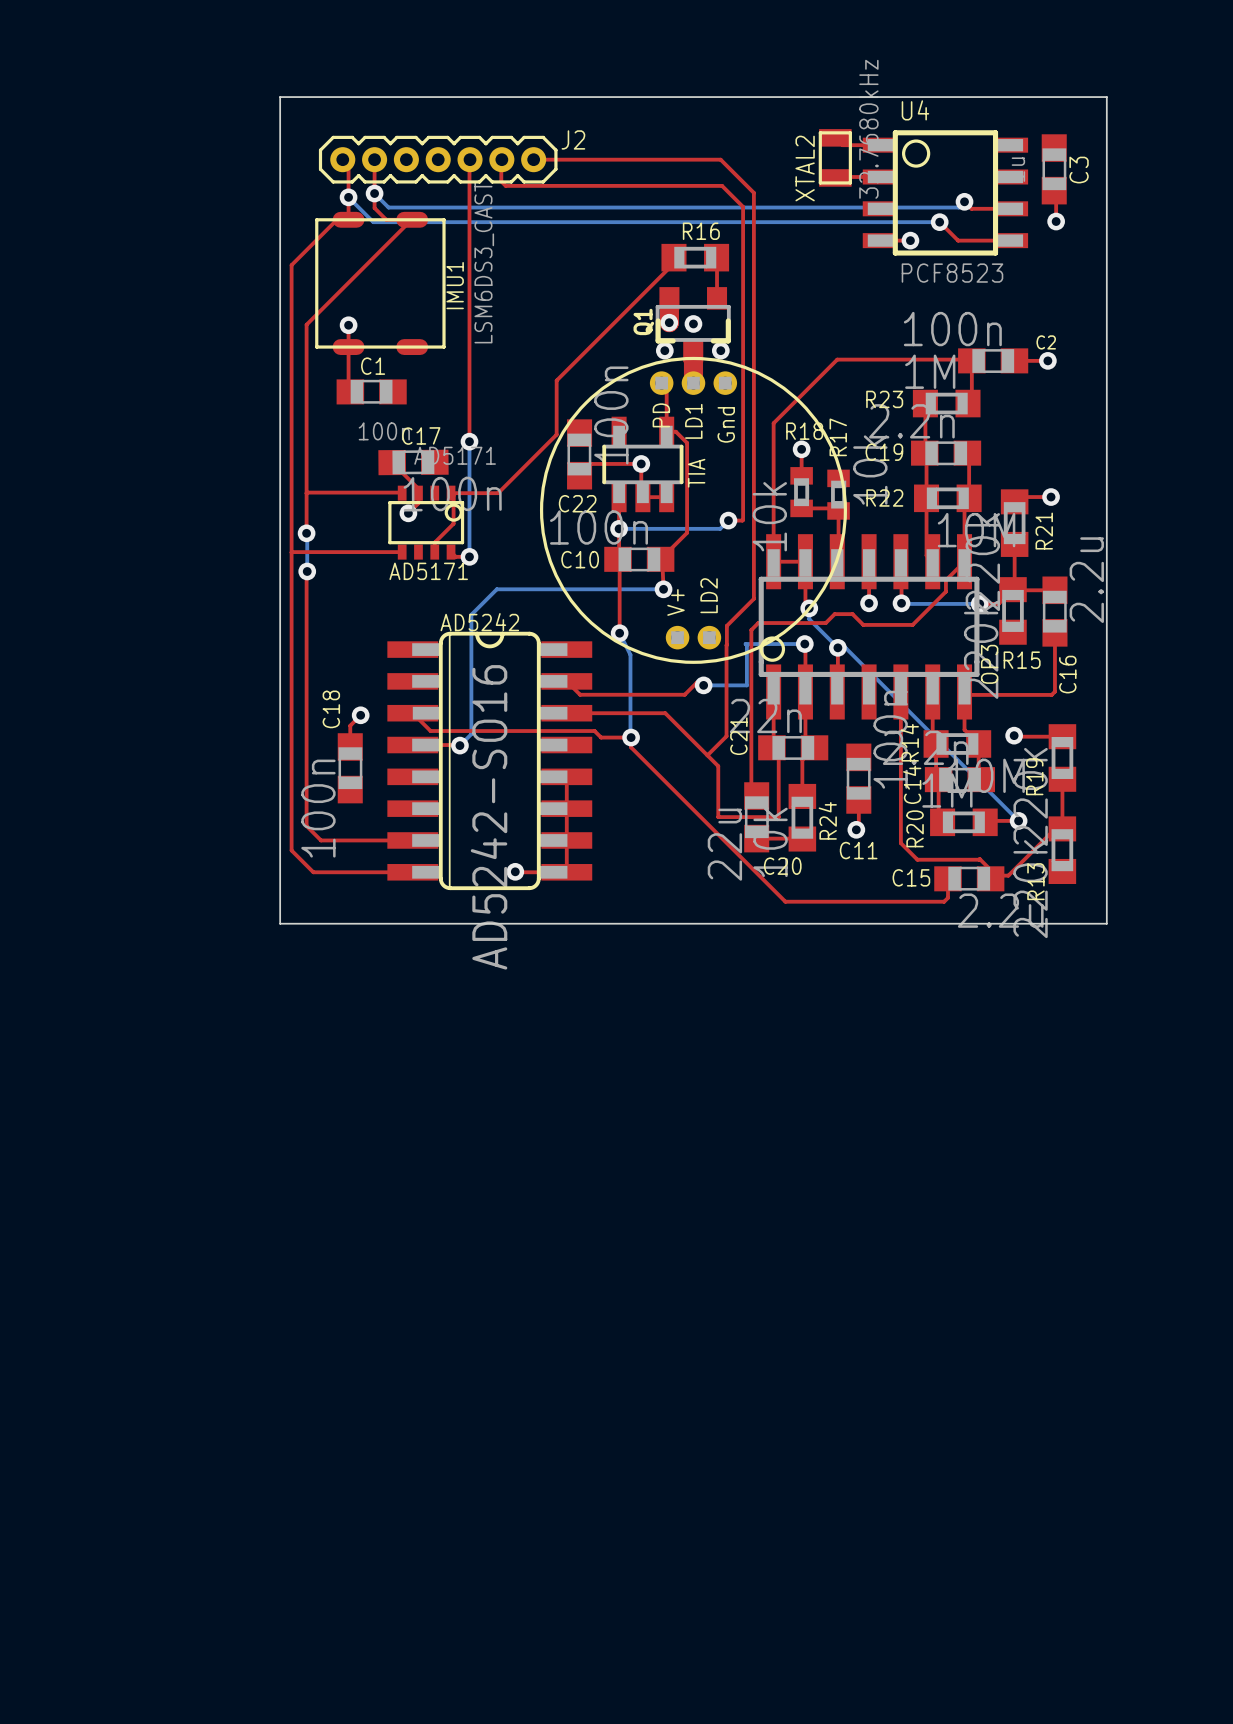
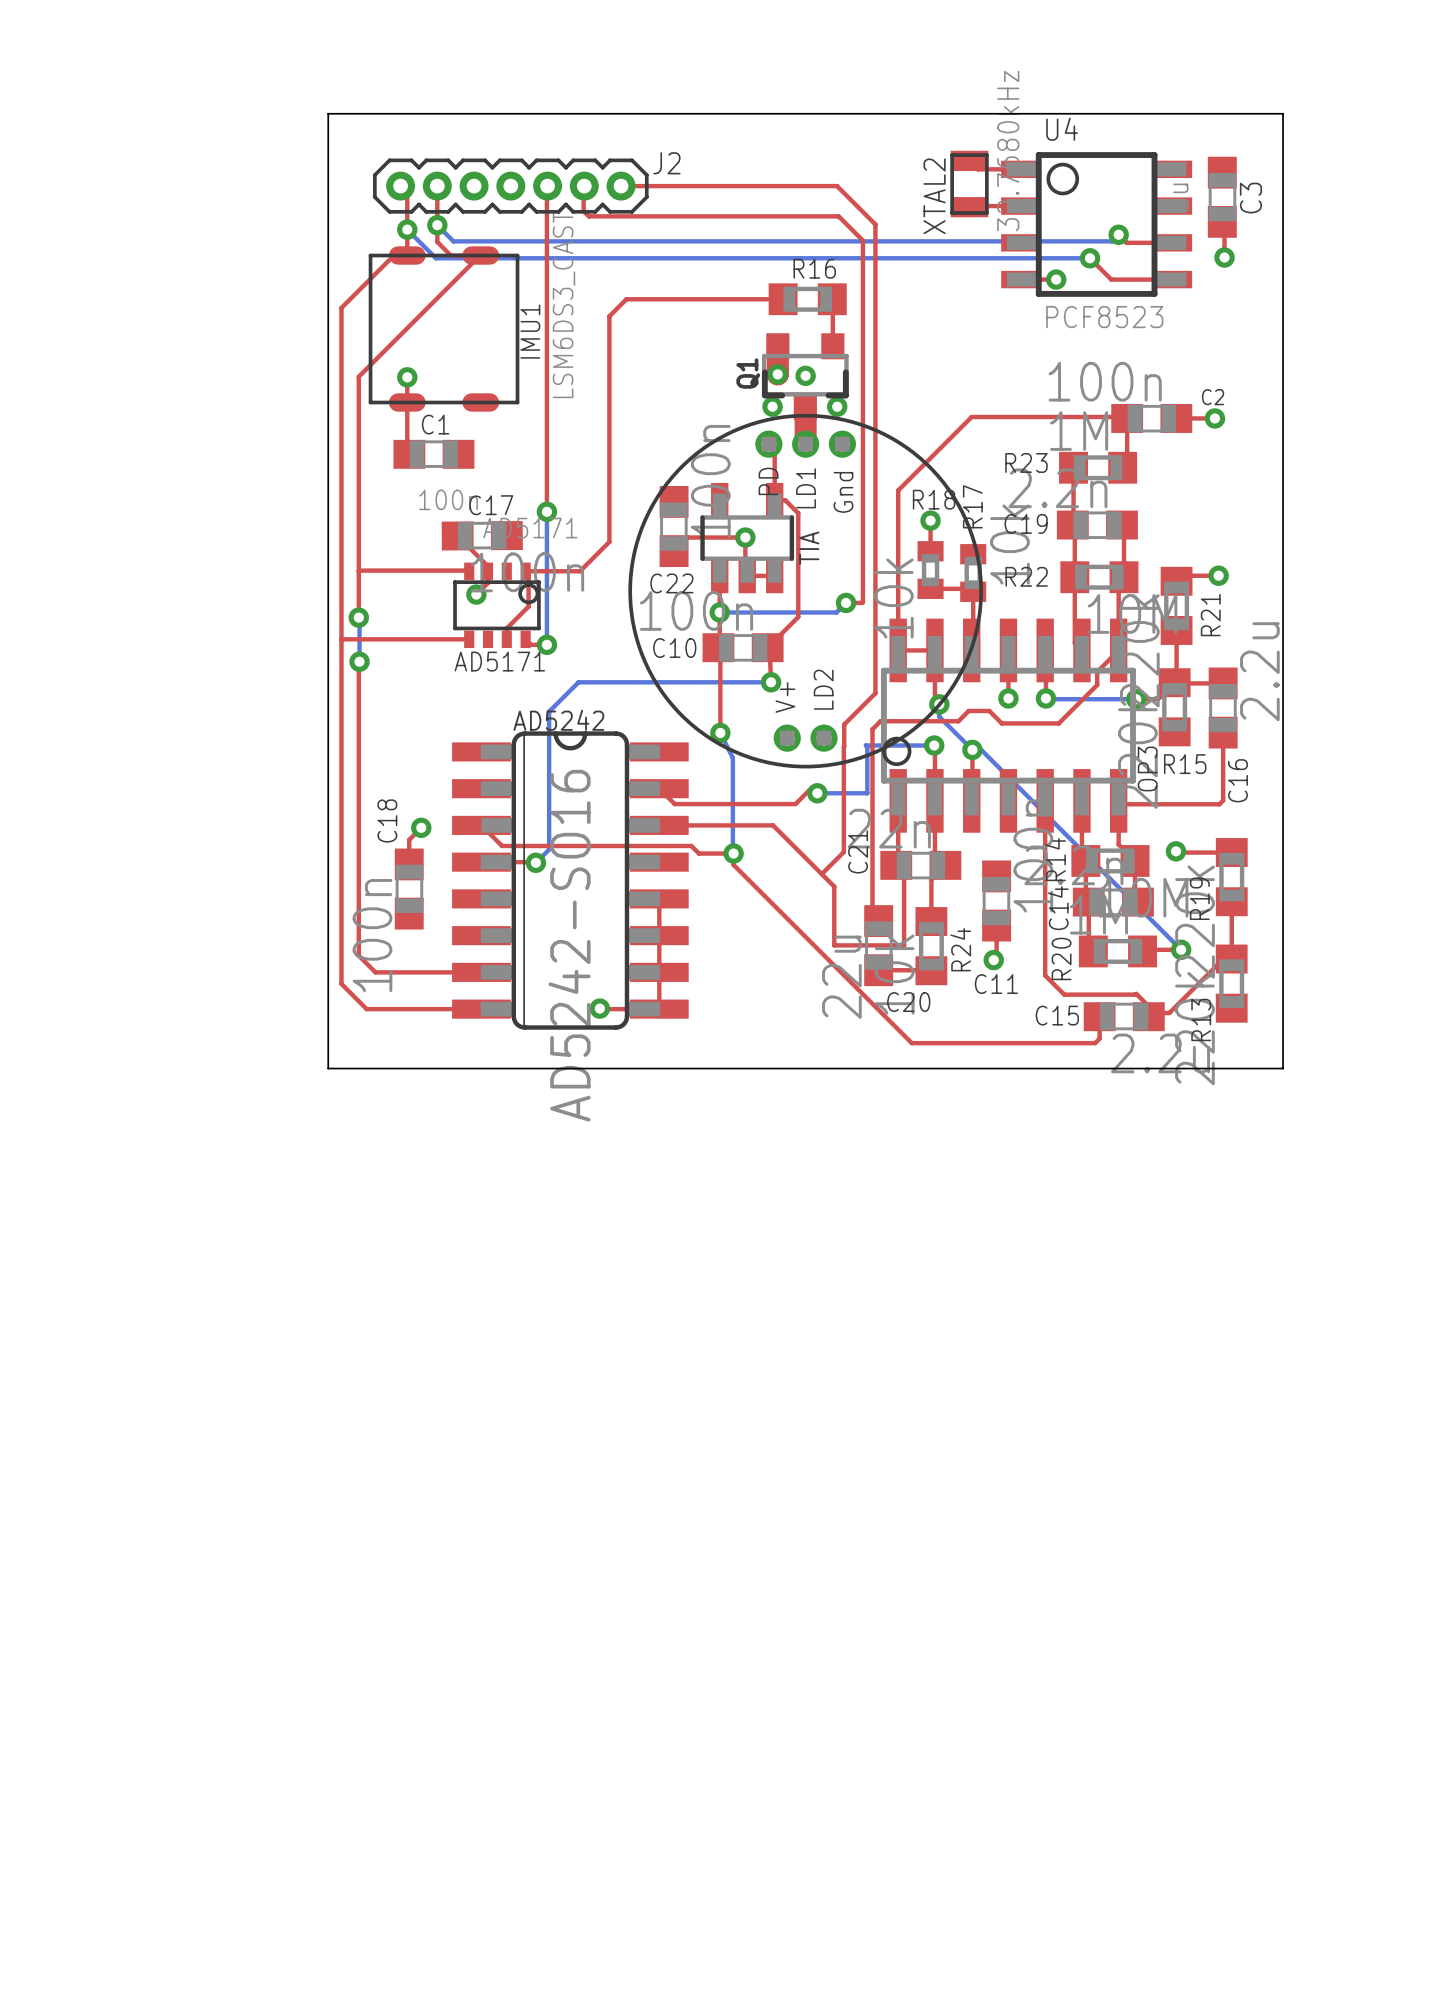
top track: (673, 257) (673, 263) (556, 380) (556, 434) (523, 467) -> (783, 299) (626, 299) (609, 316) (609, 541)

